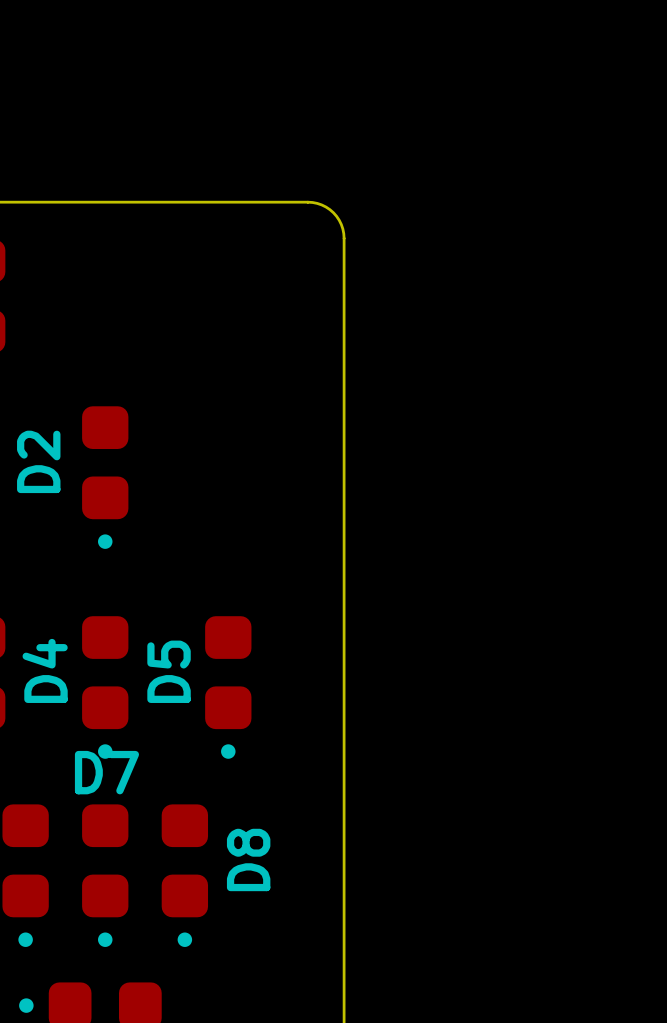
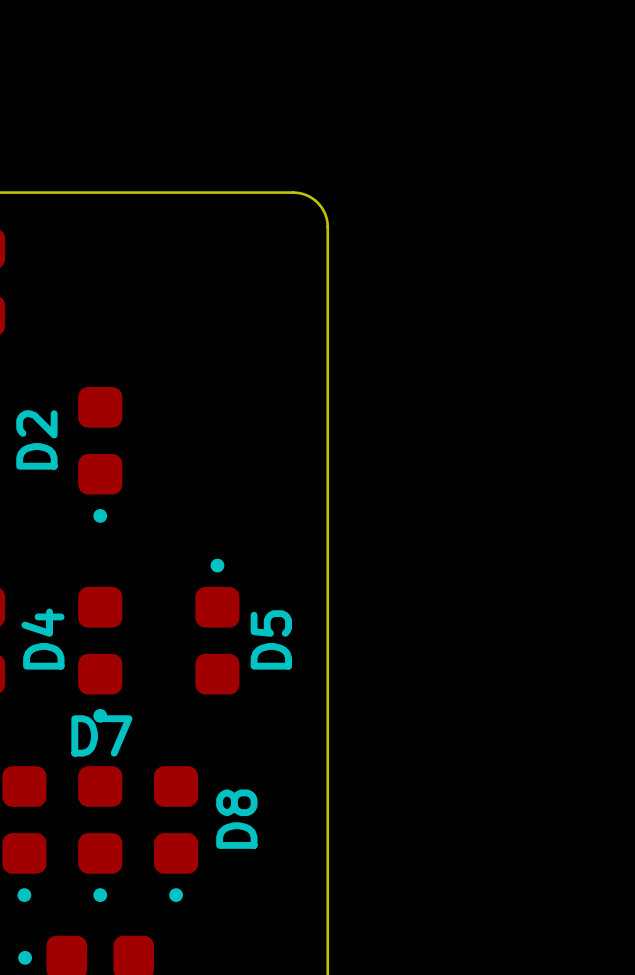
D5 rotation: 0° (228, 687) -> 180° (217, 626)

